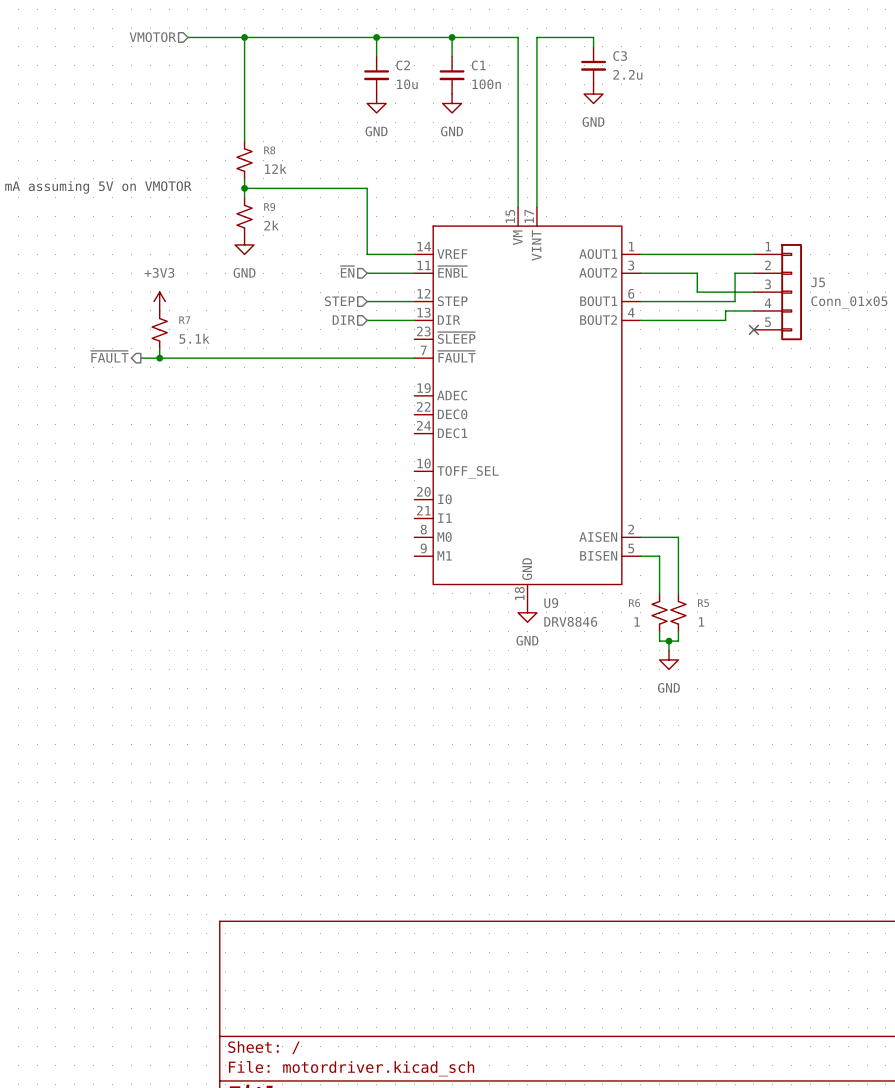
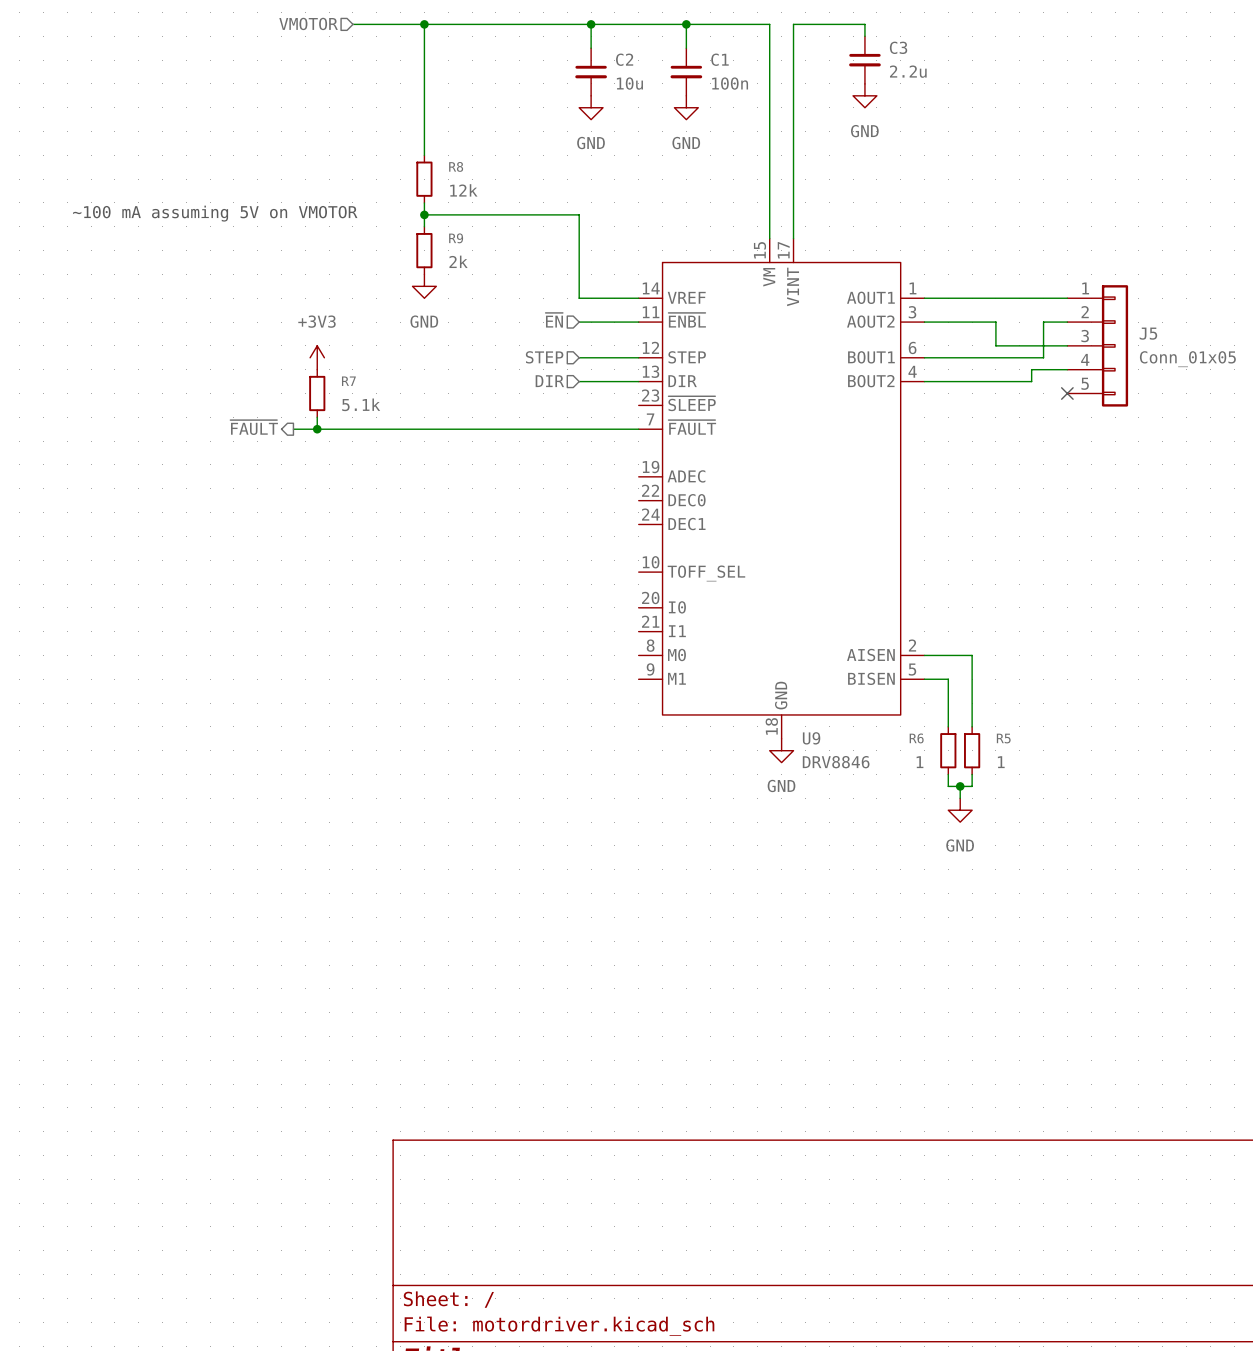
R8 symbol: [237, 141, 253, 179] -> [416, 155, 433, 203]
R9 symbol: [237, 197, 253, 236] -> [416, 226, 433, 275]
R7 symbol: [152, 310, 168, 349] -> [309, 369, 326, 418]
R6 symbol: [652, 593, 668, 632] -> [940, 726, 957, 775]
R5 symbol: [670, 593, 686, 632] -> [964, 726, 981, 775]

